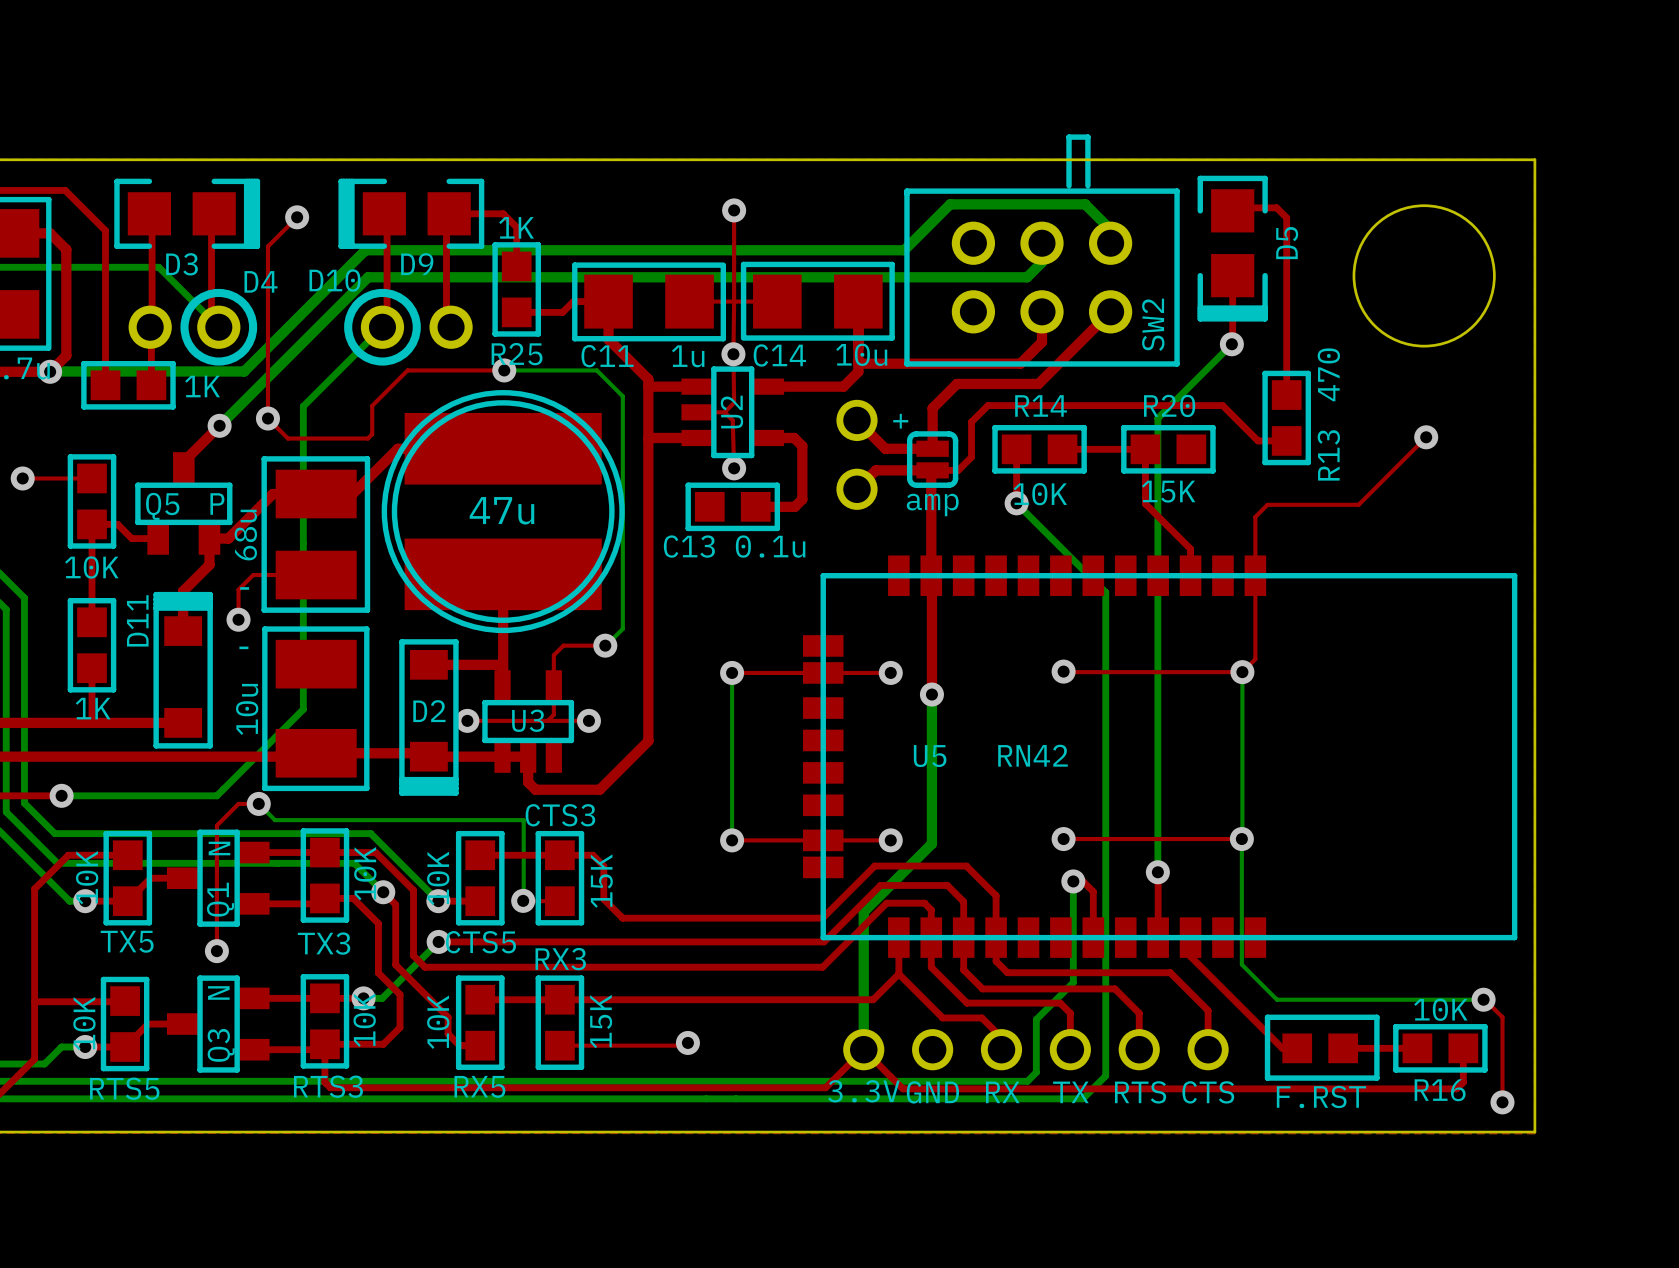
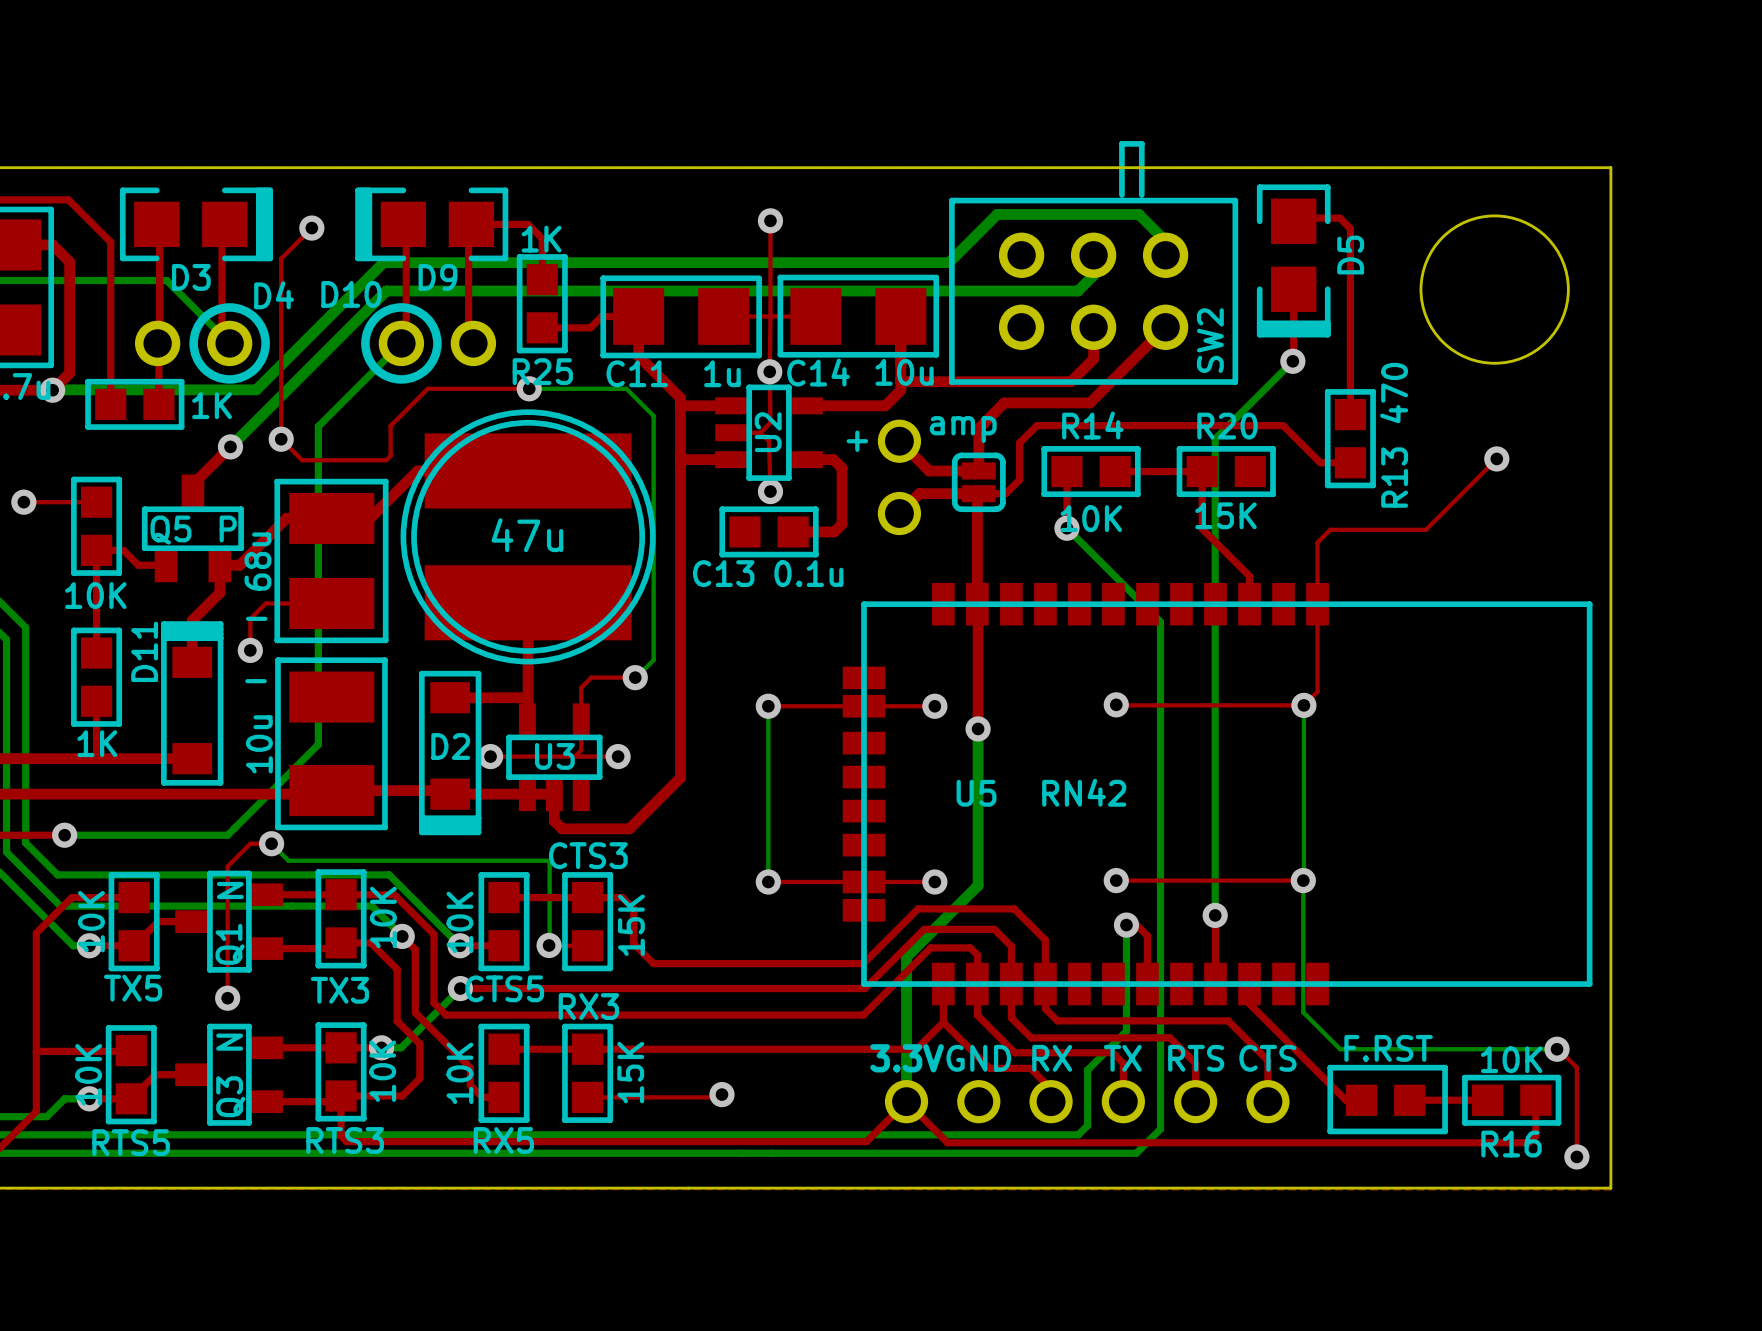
text: none -> + (857, 441)
text: + (900, 421) -> amp (963, 429)
text: amp (932, 505) -> none
text position: 3.3V (863, 1091) -> 3.3V (907, 1058)
text position: GND (932, 1092) -> GND (978, 1058)
text position: RX (1002, 1092) -> RX (1052, 1058)
text position: TX (1070, 1092) -> TX (1122, 1058)
text position: RTS (1140, 1092) -> RTS (1196, 1058)
text position: CTS (1208, 1092) -> CTS (1267, 1058)
text position: F.RST (1321, 1096) -> F.RST (1388, 1048)

